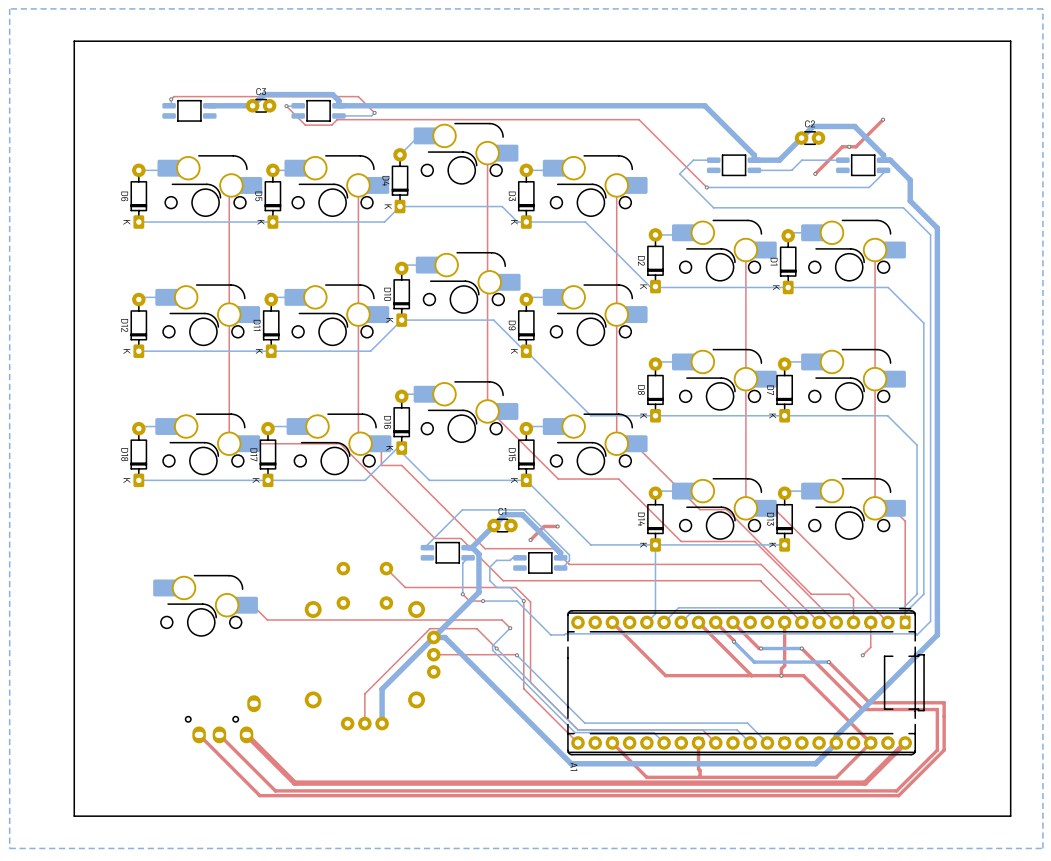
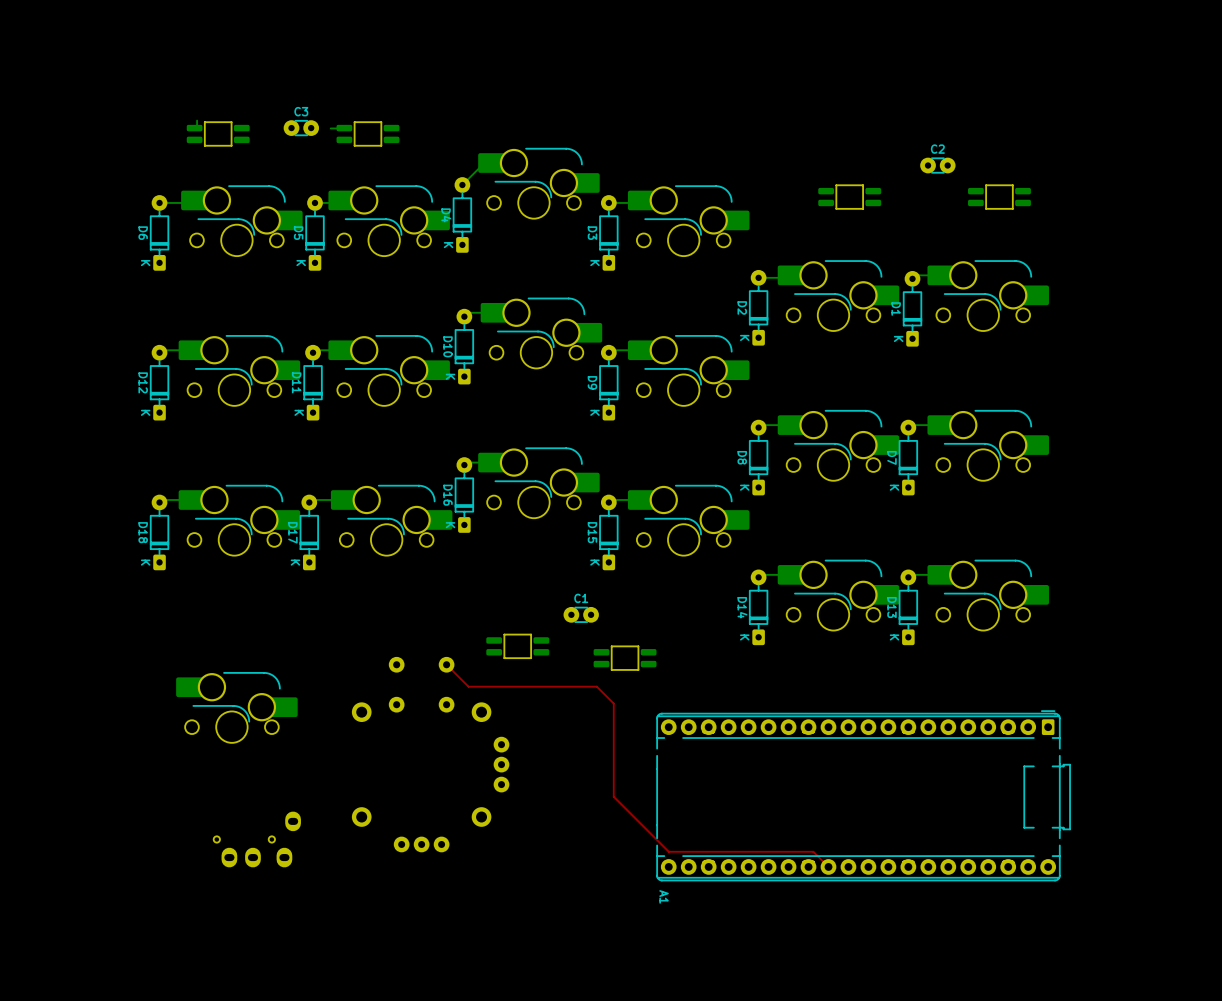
bottom zone outline: (1042, 8) (9, 8) (9, 848) (1042, 848) (1042, 8) -> none
board edge: (1010, 41) (74, 41) (74, 816) (1010, 816) (1010, 41) -> none
top track: (171, 99) (173, 96) (358, 96) (374, 112) -> none
via: (171, 99) -> none
bottom track: (209, 105) (252, 105) (263, 94) (332, 94) (338, 100) (338, 105) (704, 105) (754, 155) (754, 160) (779, 160) (813, 126) (854, 126) (883, 155) (883, 160) (890, 160) (910, 180) (910, 201) (937, 228) (937, 634) (836, 736) (836, 742) (815, 763) (571, 763) (444, 637) (433, 637) -> none
top track: (286, 106) (305, 125) (331, 125) (337, 119) (639, 119) (706, 187) -> none
via: (286, 106) -> none
bottom track: (374, 112) (371, 115) (338, 115) -> none
via: (374, 112) -> none
top track: (883, 119) (856, 146) (842, 146) (815, 173) -> none
via: (883, 119) -> none
via: (849, 146) -> none
top track: (487, 153) (487, 411) (490, 411) (558, 479) (618, 479) (681, 541) (754, 541) (836, 622) -> none
bottom track: (713, 160) (693, 160) (679, 173) (713, 207) (903, 207) (930, 234) (930, 621) (917, 634) (550, 634) (517, 601) (483, 601) -> none
bottom track: (842, 160) (801, 160) (791, 170) (754, 170) -> none
bottom track: (883, 170) (883, 173) (869, 187) (706, 187) -> none
via: (815, 173) -> none
top track: (231, 185) (229, 187) (229, 443) (340, 443) (434, 538) (460, 538) (503, 580) (761, 580) (801, 622) -> none
top track: (358, 185) (358, 441) (360, 443) (381, 445) (381, 465) (401, 465) (485, 548) (553, 548) (569, 564) (761, 564) (819, 622) -> none
top track: (616, 185) (616, 443) (633, 443) (699, 509) (726, 509) (811, 594) (849, 594) (853, 598) (853, 622) -> none
via: (706, 187) -> none
bottom track: (138, 222) (384, 222) (400, 206) (502, 206) (517, 222) (585, 222) (650, 286) (888, 287) (923, 323) (923, 594) (904, 613) (690, 613) (681, 622) -> none
top track: (745, 250) (745, 508) (773, 508) (887, 622) -> none
top track: (875, 250) (875, 508) (892, 508) (905, 521) (905, 622) -> none
bottom track: (138, 351) (370, 351) (401, 320) (493, 320) (590, 415) (887, 415) (917, 445) (917, 594) (903, 607) (678, 607) (664, 622) -> none
bottom track: (138, 480) (365, 480) (397, 448) (429, 480) (526, 480) (590, 544) (784, 544) -> none
top track: (557, 526) (544, 526) (530, 540) -> none
via: (557, 526) -> none
via: (530, 540) -> none
bottom track: (655, 544) (655, 613) (646, 622) -> none
bottom track: (427, 547) (427, 544) (462, 509) (524, 509) (569, 554) (569, 560) (560, 568) -> none
bottom track: (468, 547) (472, 547) (478, 554) (478, 592) (382, 689) (382, 723) -> none
bottom track: (471, 547) (504, 514) (522, 514) (560, 552) (560, 557) -> none
bottom track: (473, 557) (468, 557) (462, 563) (462, 594) -> none
bottom track: (519, 557) (496, 560) (489, 567) (489, 580) (496, 587) (510, 587) (523, 601) -> none
top track: (462, 594) (469, 601) (483, 601) -> none
via: (462, 594) -> none
via: (483, 601) -> none
top track: (523, 601) (523, 688) (577, 742) -> none
via: (523, 601) -> none
top track: (227, 605) (252, 605) (267, 620) (502, 620) (510, 628) -> none
top track: (612, 622) (665, 675) (803, 675) (870, 742) (836, 777) (646, 777) (612, 742) -> none
top track: (698, 622) (751, 675) -> none
top track: (715, 622) (733, 641) -> none
top track: (732, 622) (761, 648) -> none
top track: (784, 622) (784, 665) (781, 668) (781, 675) -> none
top track: (870, 622) (870, 647) (862, 655) -> none
bottom track: (510, 628) (492, 645) (492, 650) (574, 732) (653, 732) (664, 742) -> none
via: (510, 628) -> none
bottom track: (733, 641) (754, 662) (828, 662) -> none
via: (733, 641) -> none
top track: (496, 648) (476, 628) (430, 628) (364, 693) (364, 723) (361, 723) -> none
bottom track: (496, 648) (578, 729) (737, 729) (750, 742) -> none
via: (496, 648) -> none
via: (761, 648) -> none
top track: (801, 648) (862, 709) (937, 709) (937, 750) (896, 790) (275, 790) (219, 734) -> none
bottom track: (801, 648) (761, 648) -> none
via: (801, 648) -> none
top track: (433, 654) (517, 655) -> none
bottom track: (517, 655) (584, 723) (747, 723) (767, 742) -> none
via: (517, 655) -> none
via: (862, 655) -> none
top track: (828, 662) (869, 702) (944, 702) (944, 750) (898, 795) (259, 795) (199, 734) -> none
via: (828, 662) -> none
via: (781, 675) -> none
top track: (246, 734) (294, 783) (865, 783) (905, 742) -> none
top track: (698, 742) (700, 777) -> none

